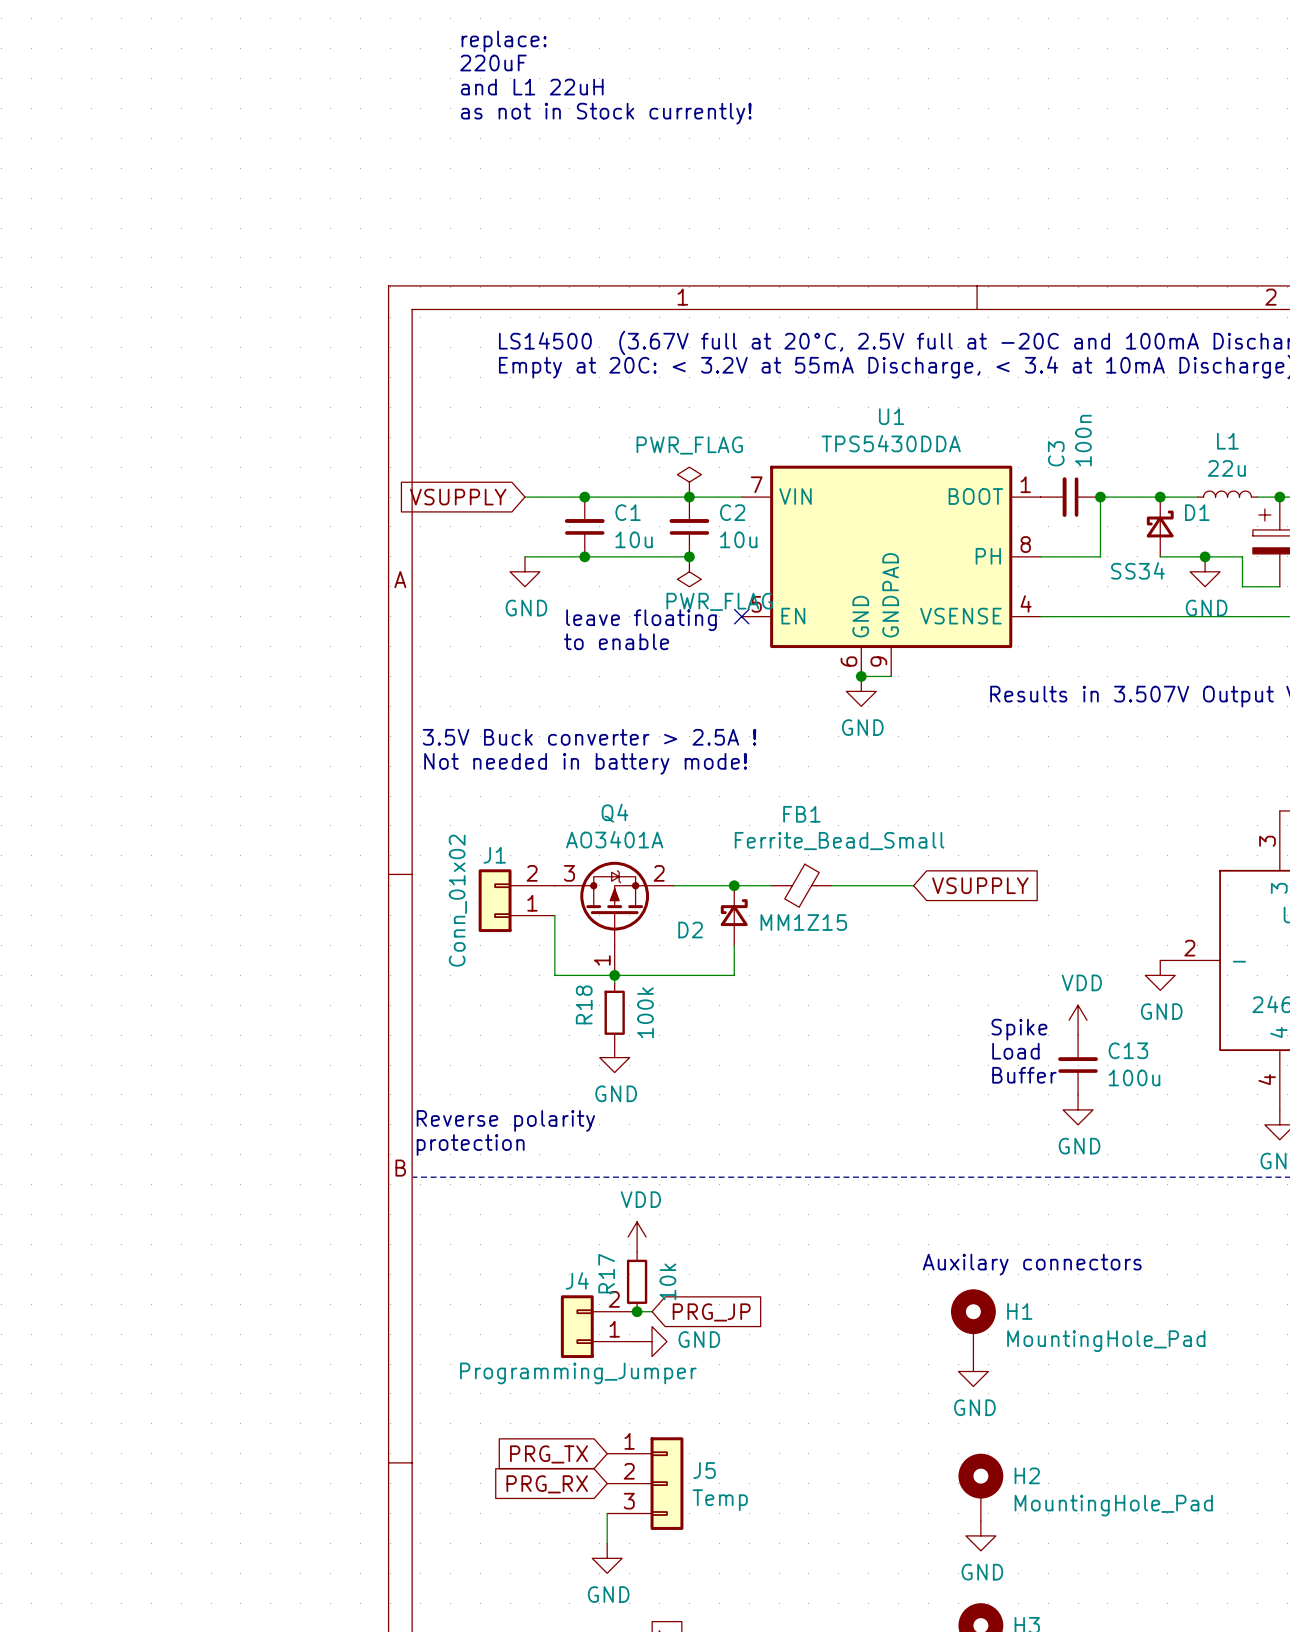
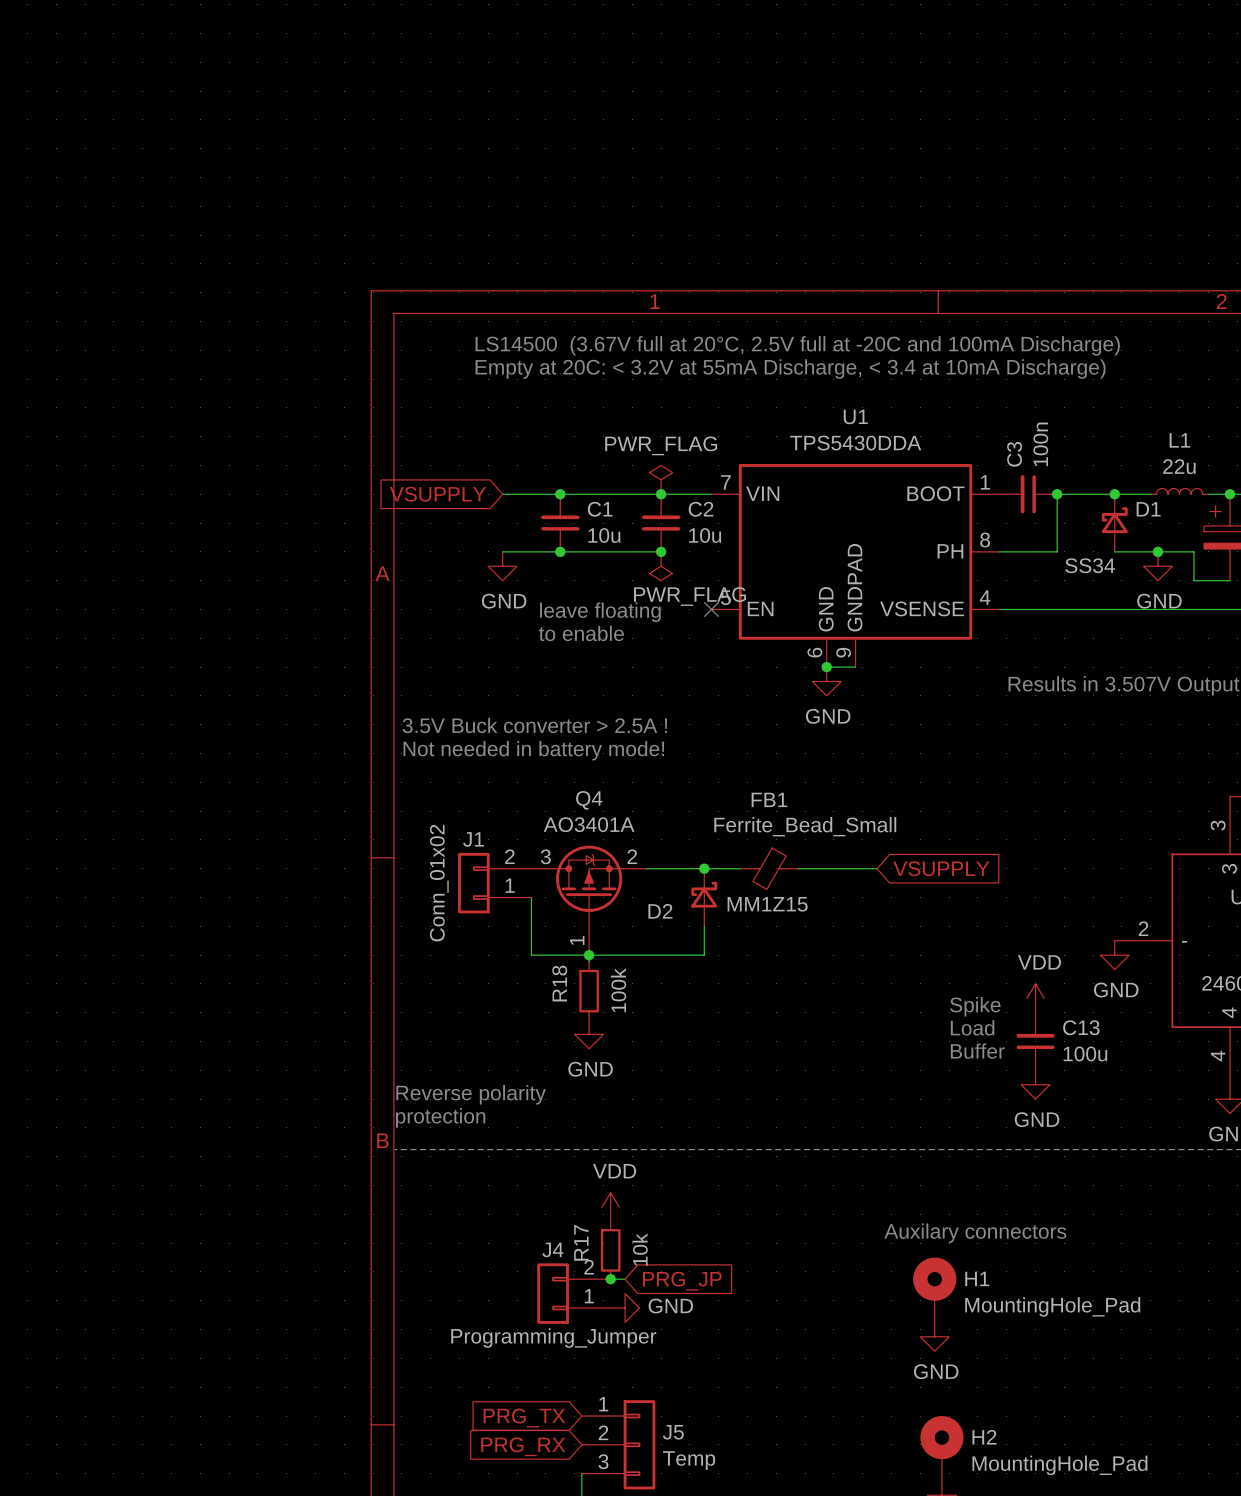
text: replace: (504, 41) -> none
text: 220uF (493, 63) -> none
text: and L1 22uH (532, 87) -> none
text: as not in Stock currently! (606, 113) -> none

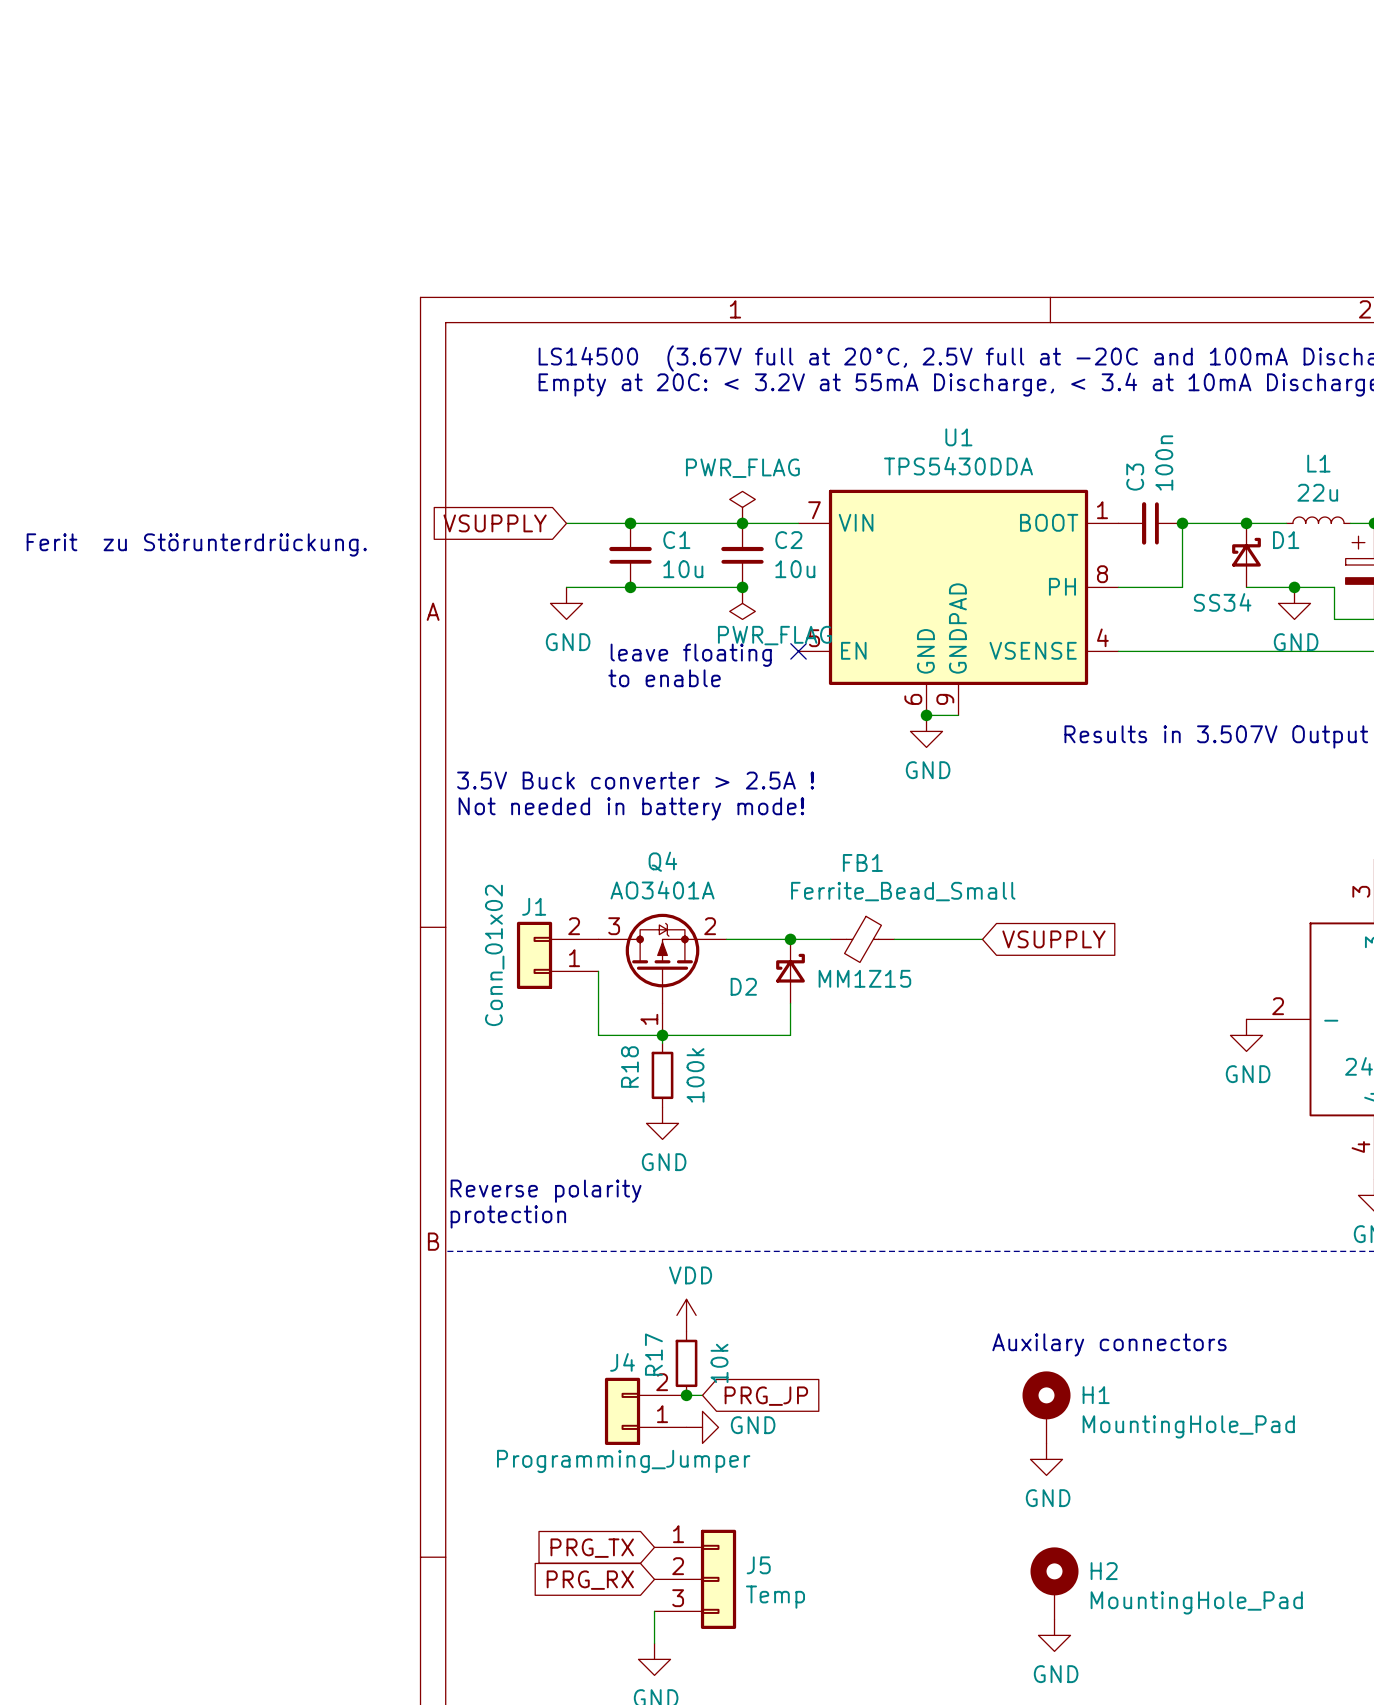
text: none -> Ferit zu Störunterdrückung. (196, 544)
power symbol: VDD (1035, 998) -> none
text: Spike (975, 1006) -> none
text: Load (972, 1027) -> none
C13: 100u (1035, 1041) -> none
text: Buffer (977, 1051) -> none
power symbol: GND (1035, 1084) -> none

